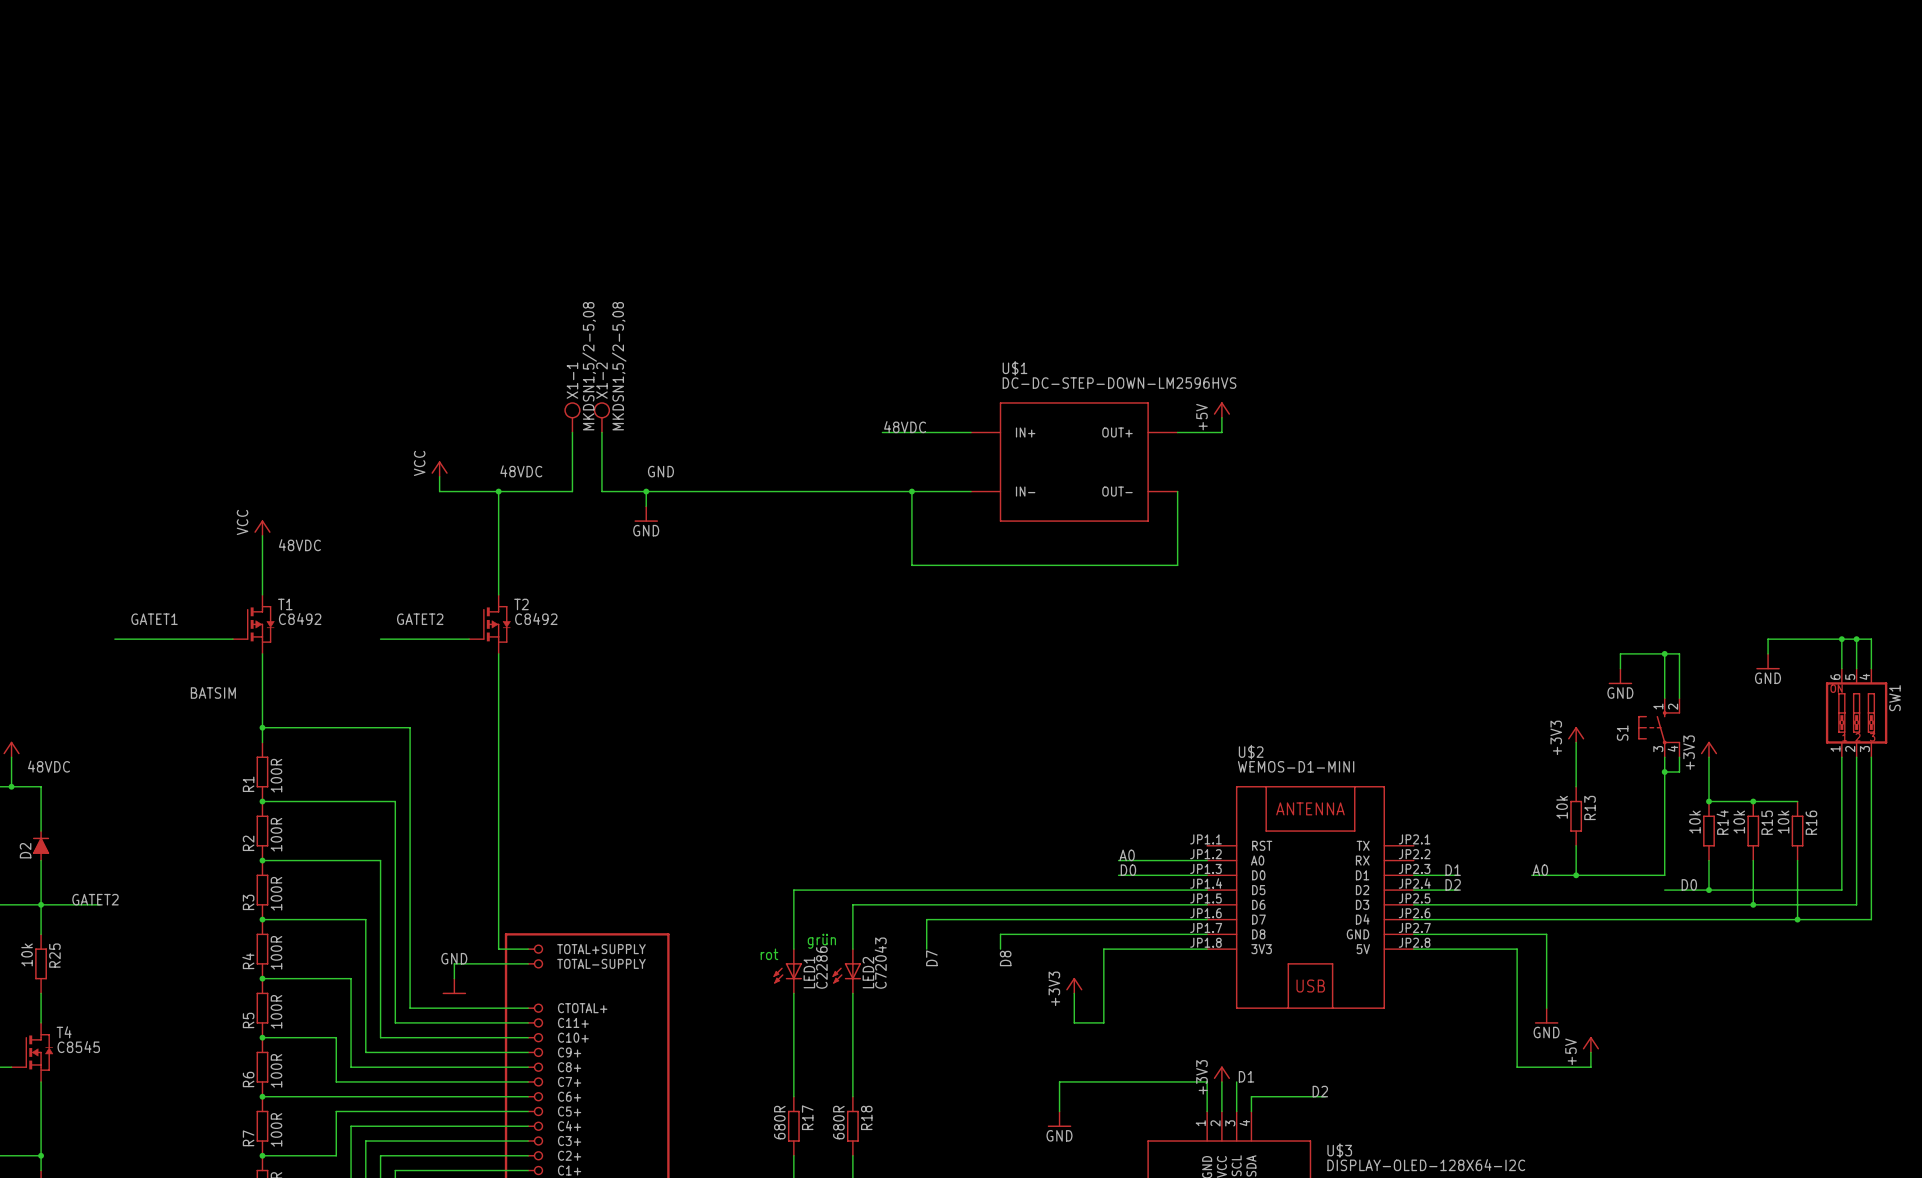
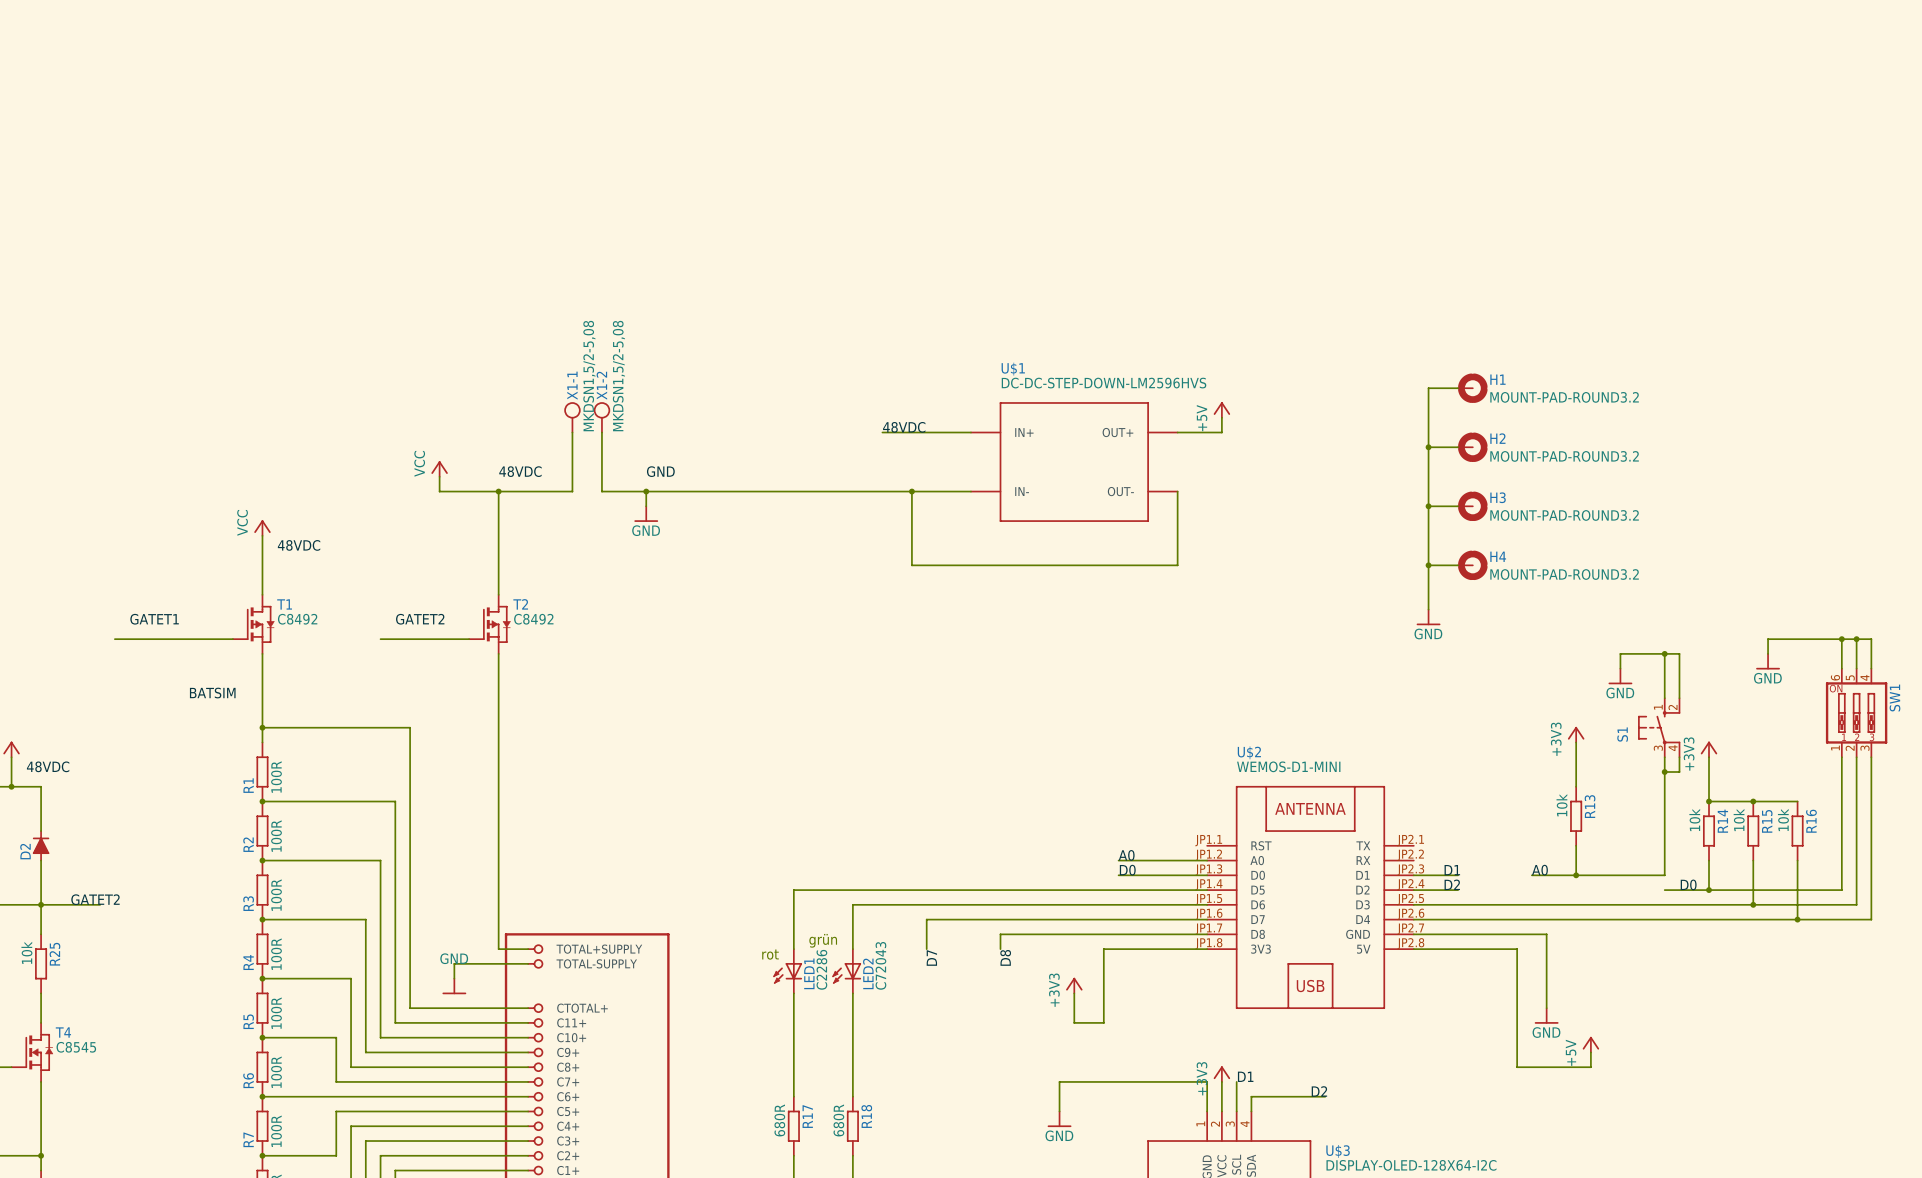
wire: none -> (1458, 388) (1428, 388) (1428, 609)
H1: none -> MOUNT-PAD-ROUND3.2 (1472, 388)
wire: none -> (1428, 447) (1458, 447)
junction: none -> (1428, 447)
H2: none -> MOUNT-PAD-ROUND3.2 (1472, 447)
wire: none -> (1428, 506) (1458, 506)
junction: none -> (1428, 506)
H3: none -> MOUNT-PAD-ROUND3.2 (1472, 506)
wire: none -> (1428, 565) (1458, 565)
junction: none -> (1428, 565)
H4: none -> MOUNT-PAD-ROUND3.2 (1472, 565)
power symbol: none -> GND (1428, 617)

